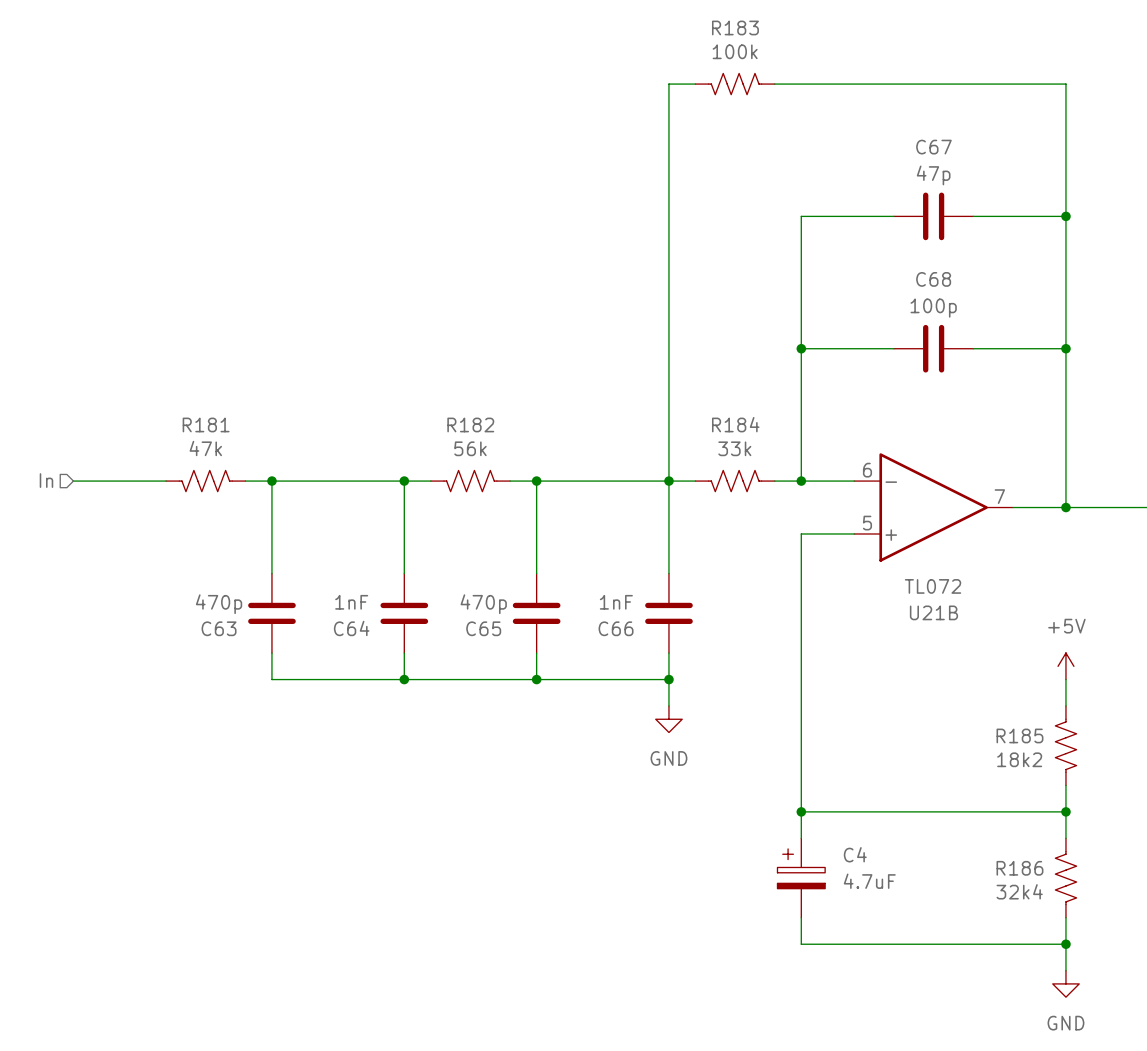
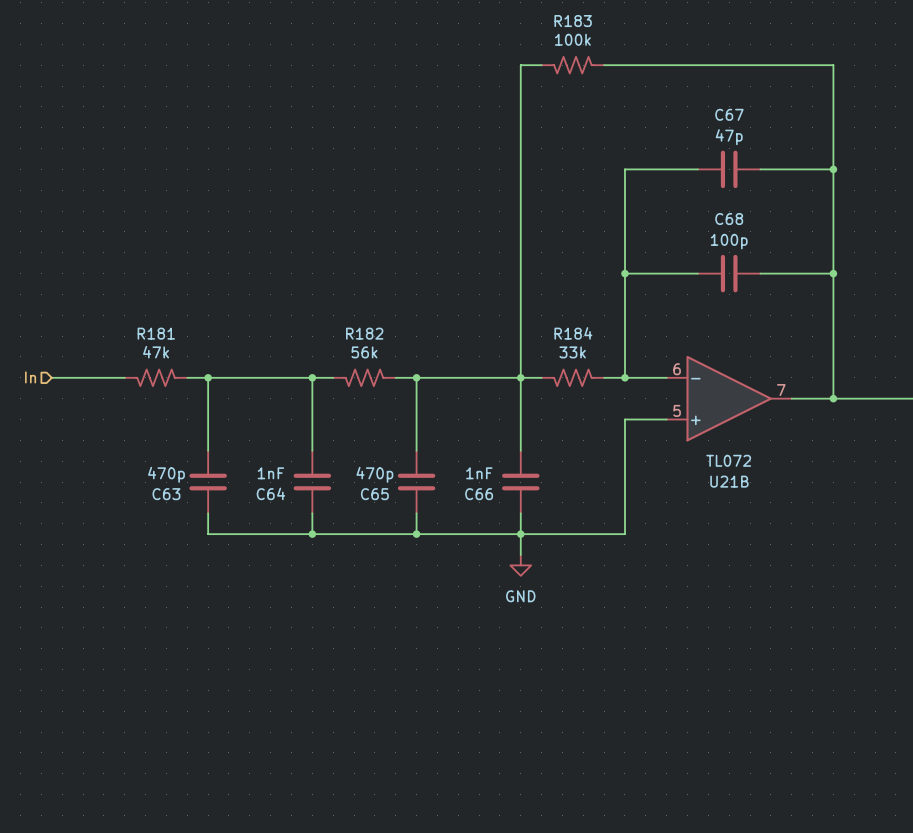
power symbol: +5V (1065, 666) -> none
wire: (801, 679) (801, 838) -> (624, 534) (520, 534)
wire: (1065, 679) (1065, 706) -> none
R185: 18k2 (1065, 745) -> none
wire: (1065, 785) (1065, 838) -> none
wire: (801, 811) (1065, 811) -> none
junction: (801, 811) -> none
junction: (1065, 811) -> none
C4: 4.7uF (801, 878) -> none
R186: 32k4 (1065, 878) -> none
wire: (801, 917) (801, 944) (1065, 944) -> none
wire: (1065, 917) (1065, 970) -> none
junction: (1065, 944) -> none
power symbol: GND (1065, 983) -> none

